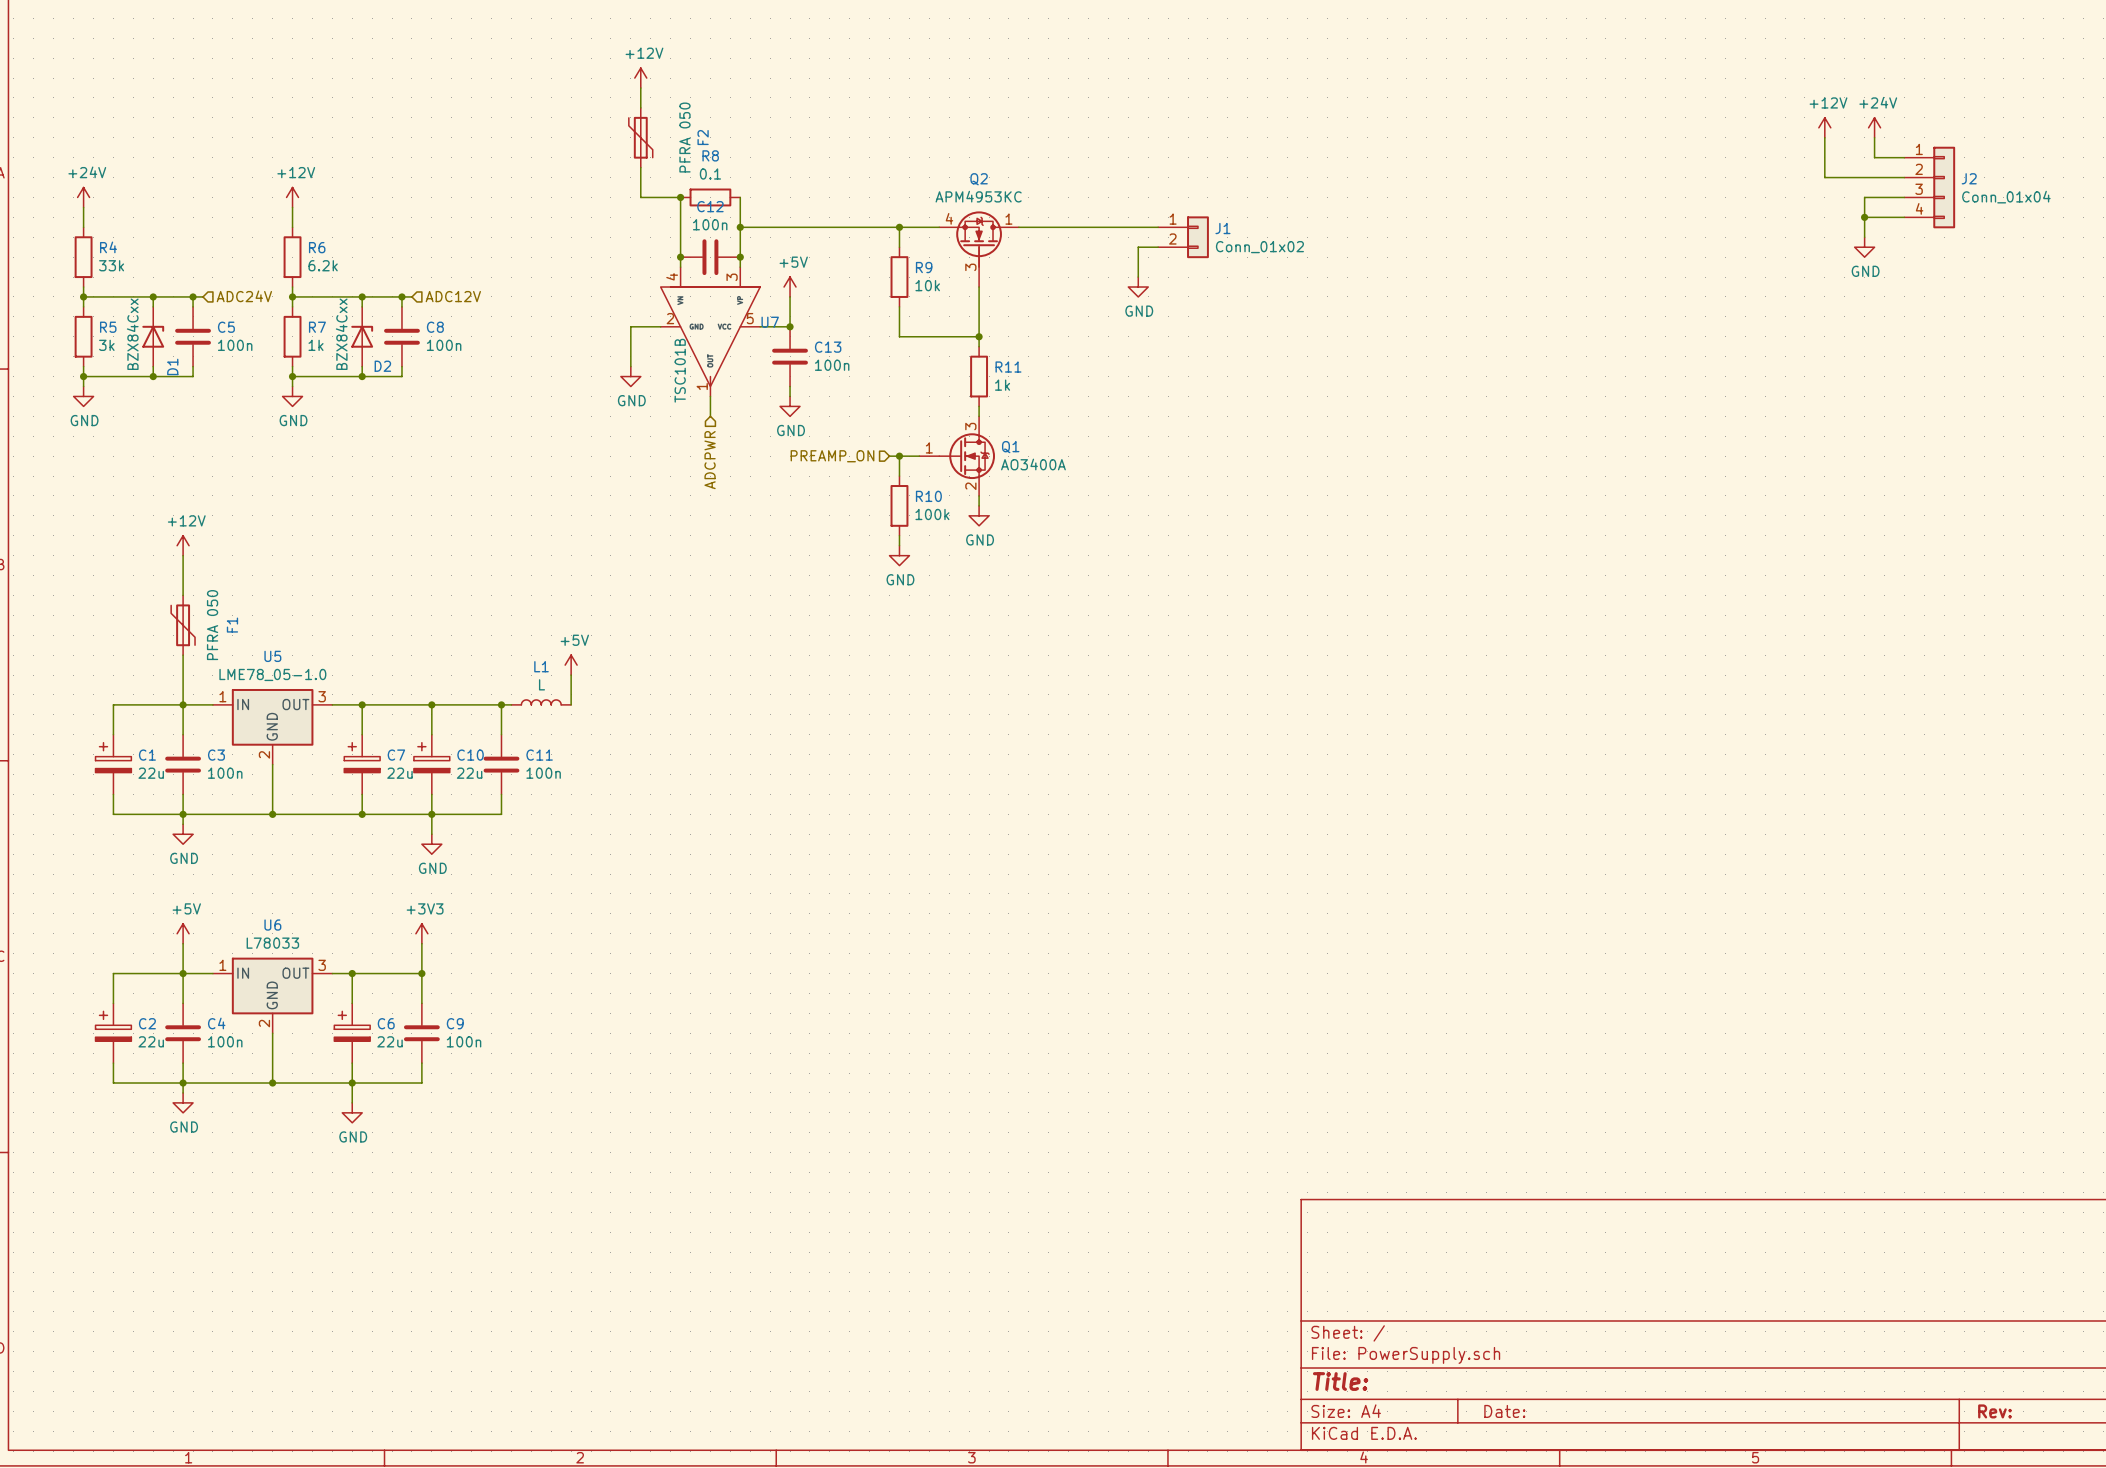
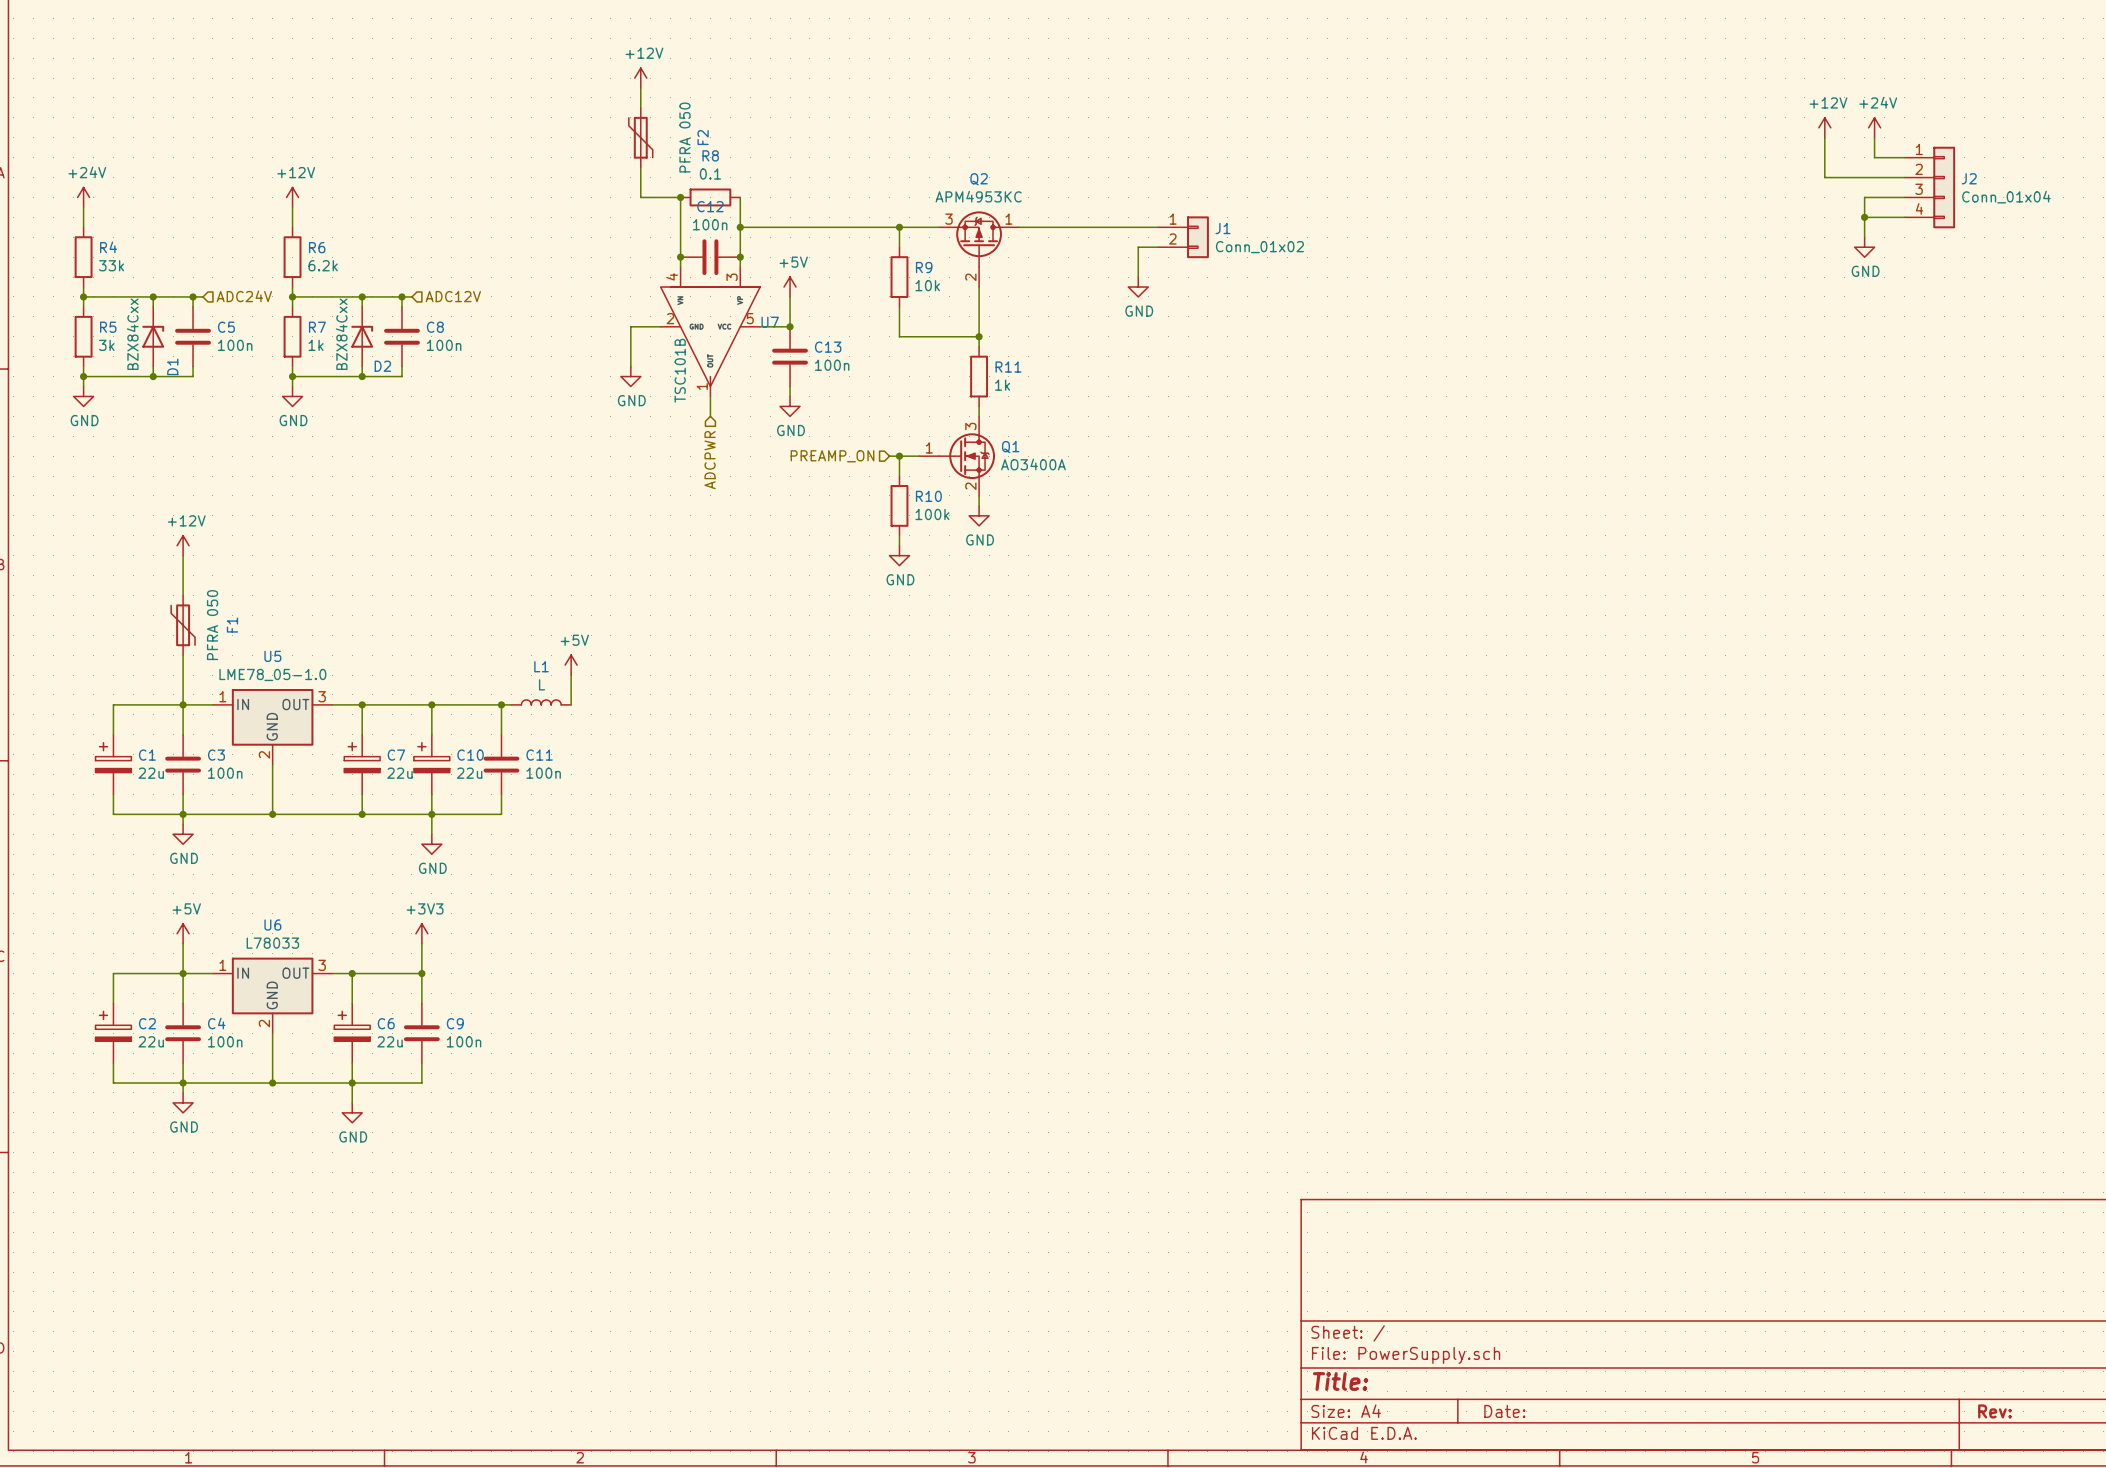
Q2 symbol: [939, 211, 1019, 288] -> [939, 211, 1019, 288]

